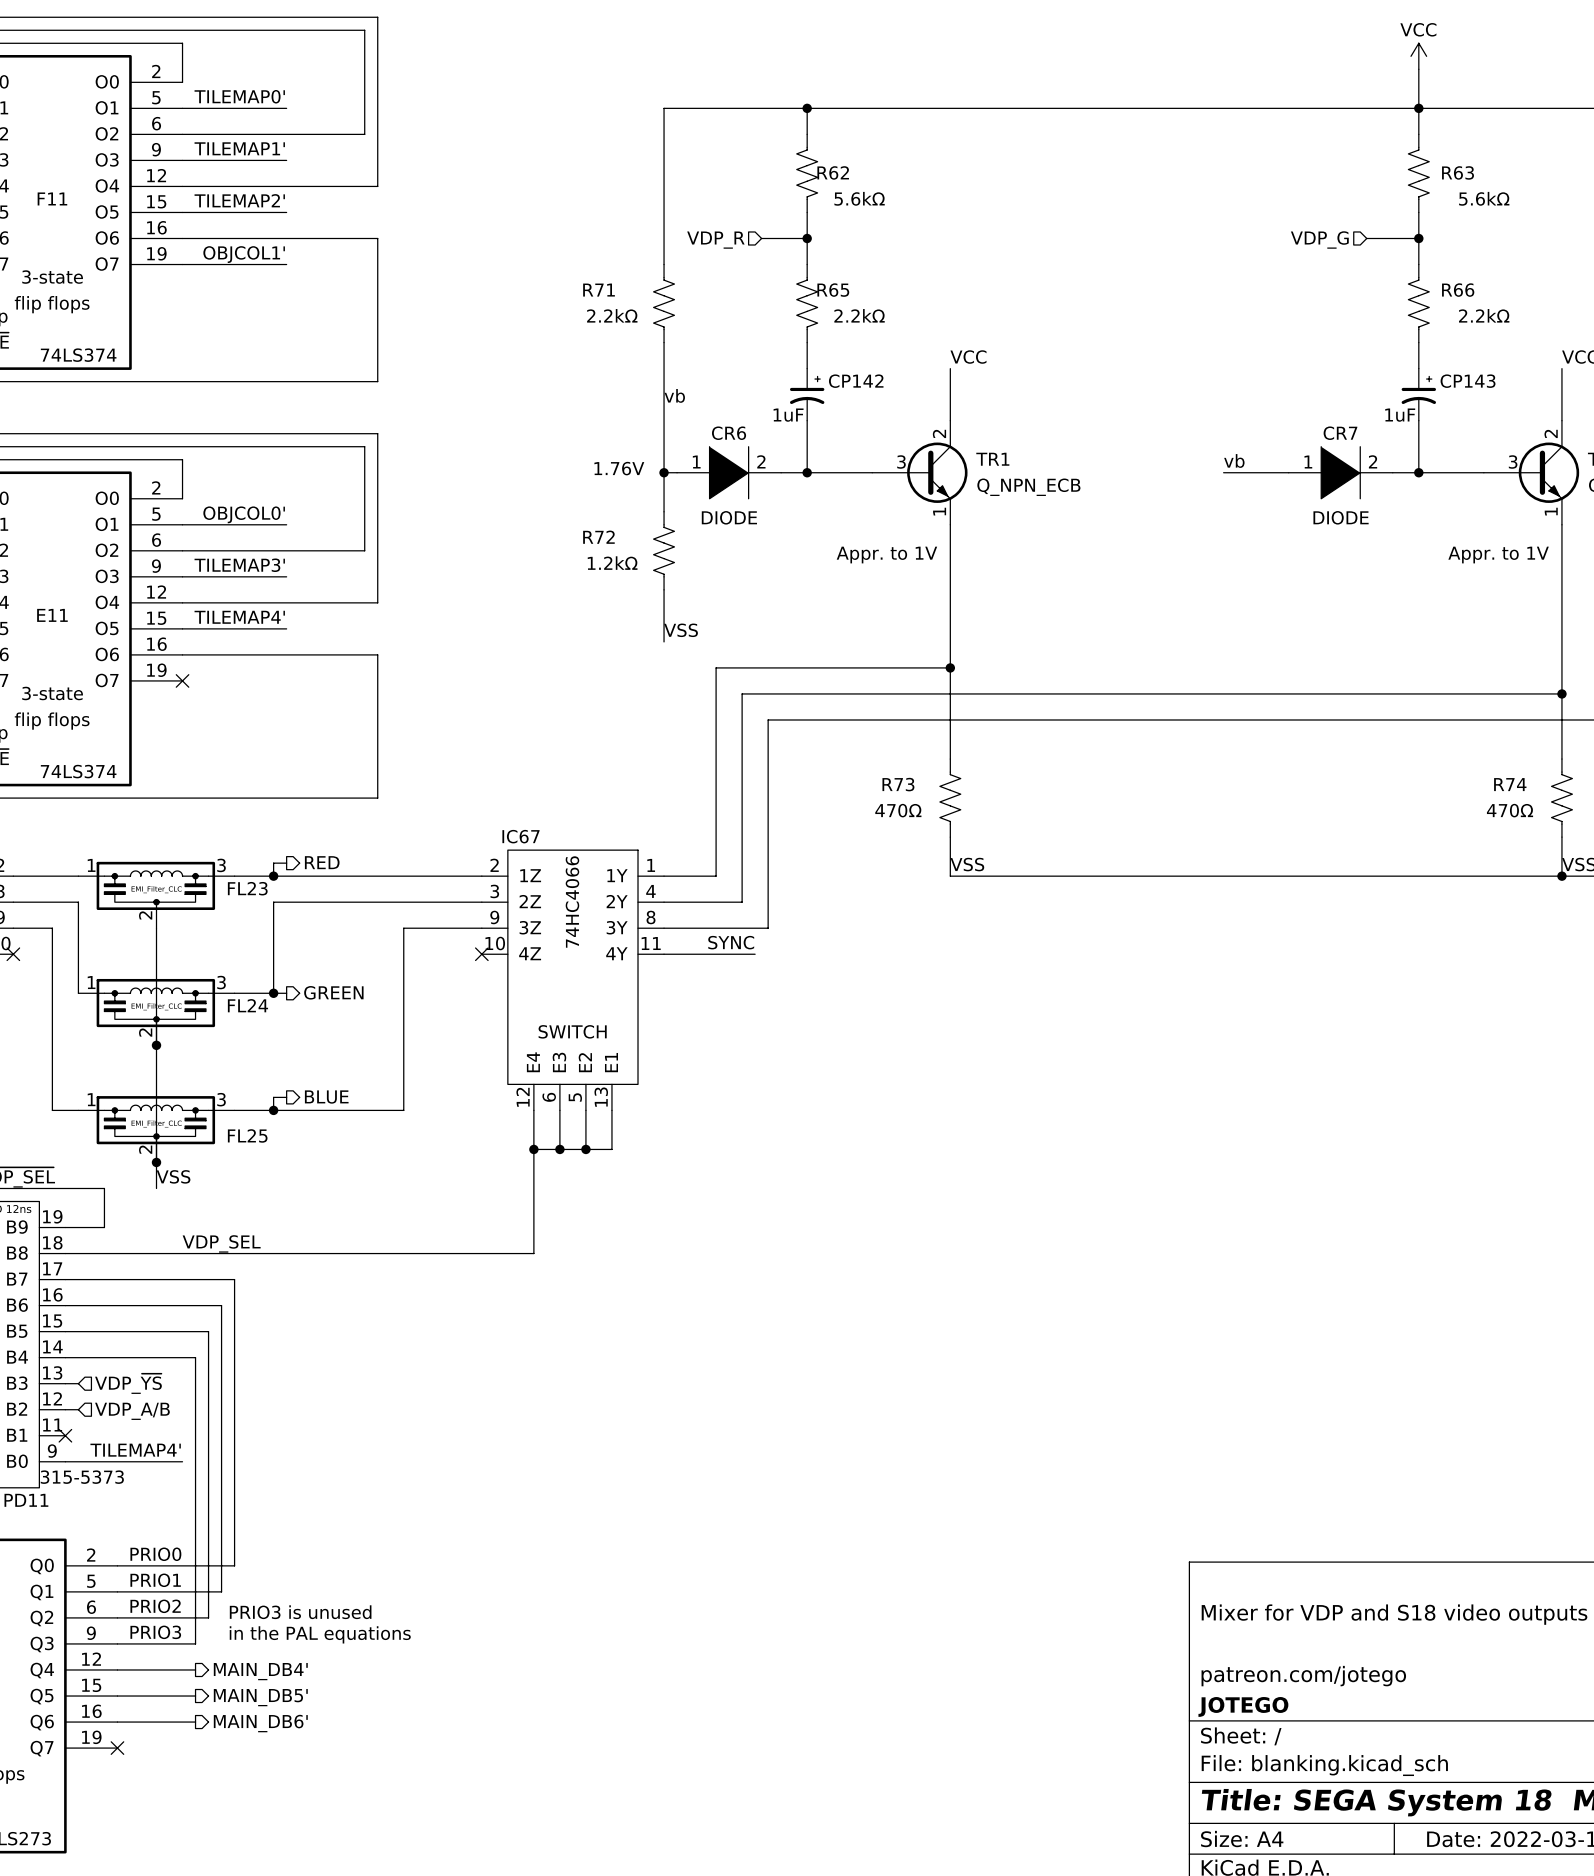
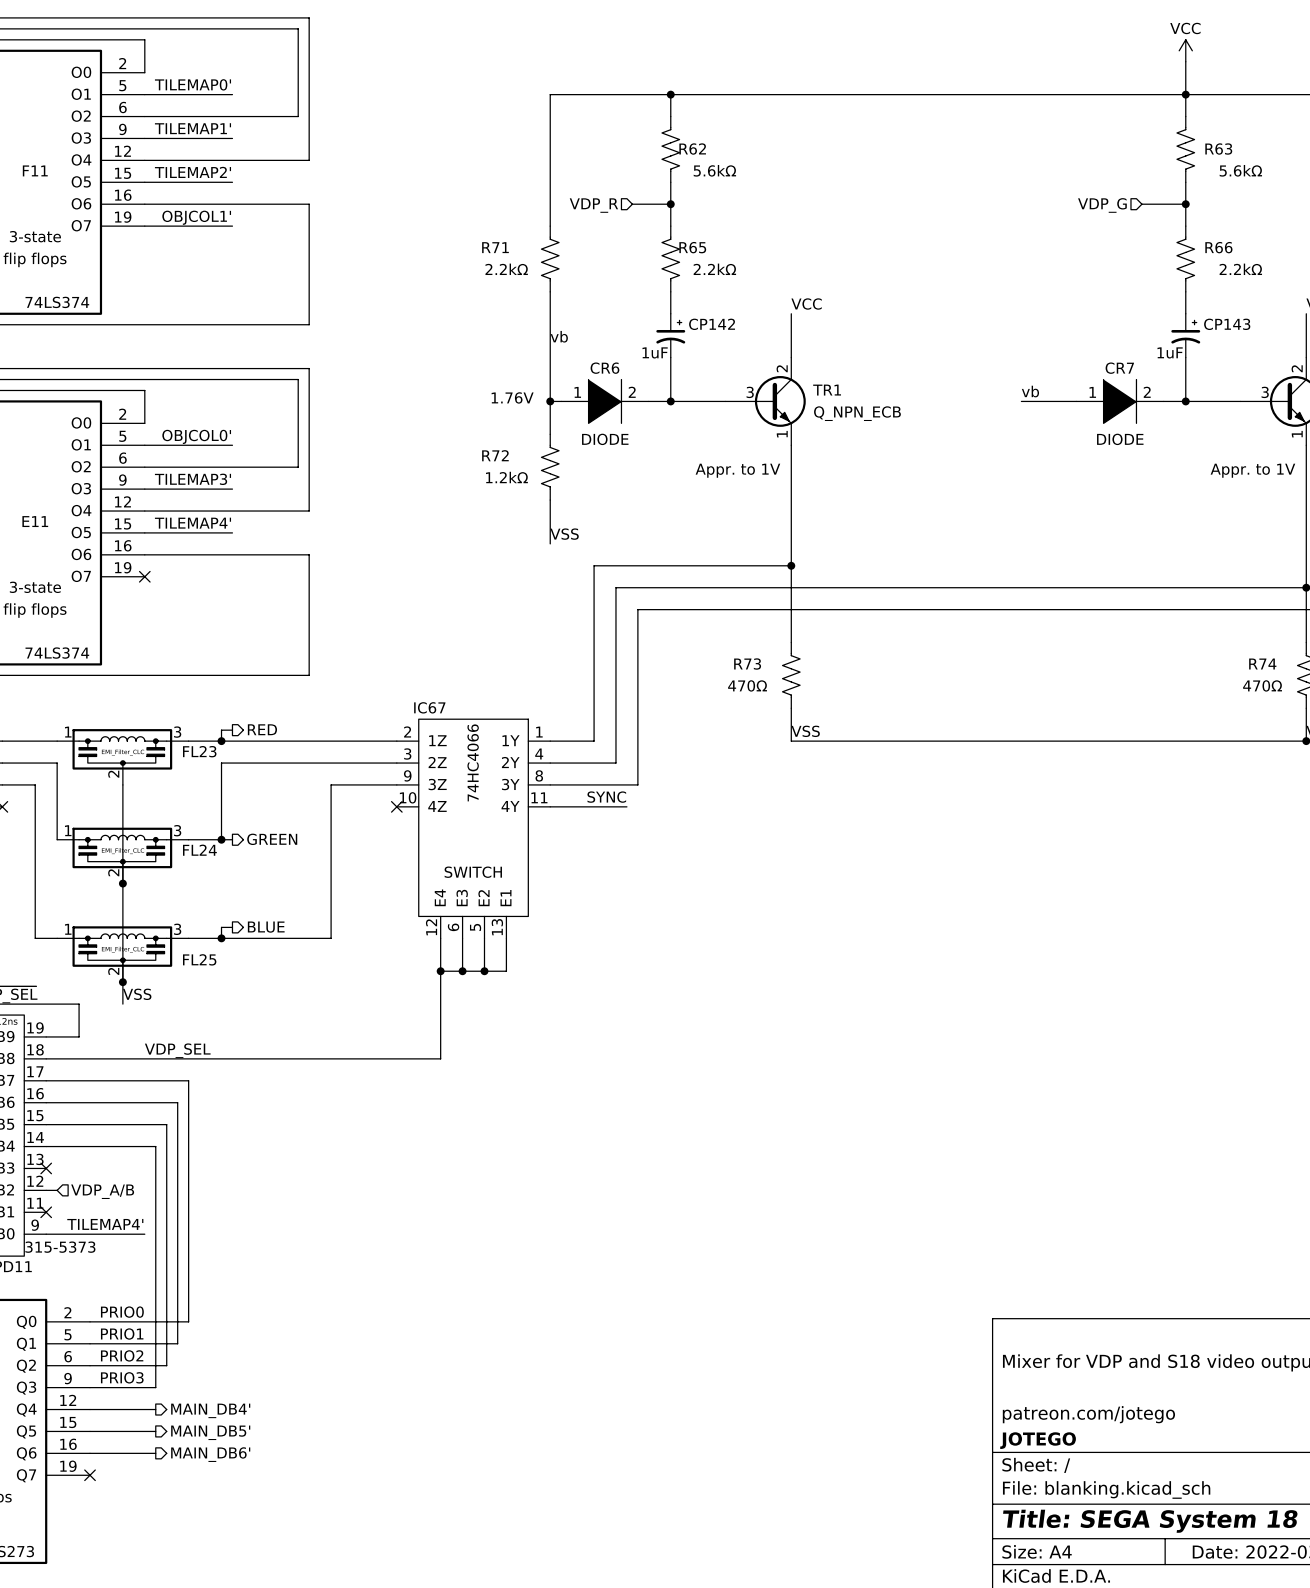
wire: (65, 1383) (78, 1383) -> none
no-connect mark: none -> (46, 1168)
hierarchical label: VDP_~{YS} (128, 1383) -> none
text: PRIO3 is unused (300, 1612) -> none
text: in the PAL equations (320, 1634) -> none

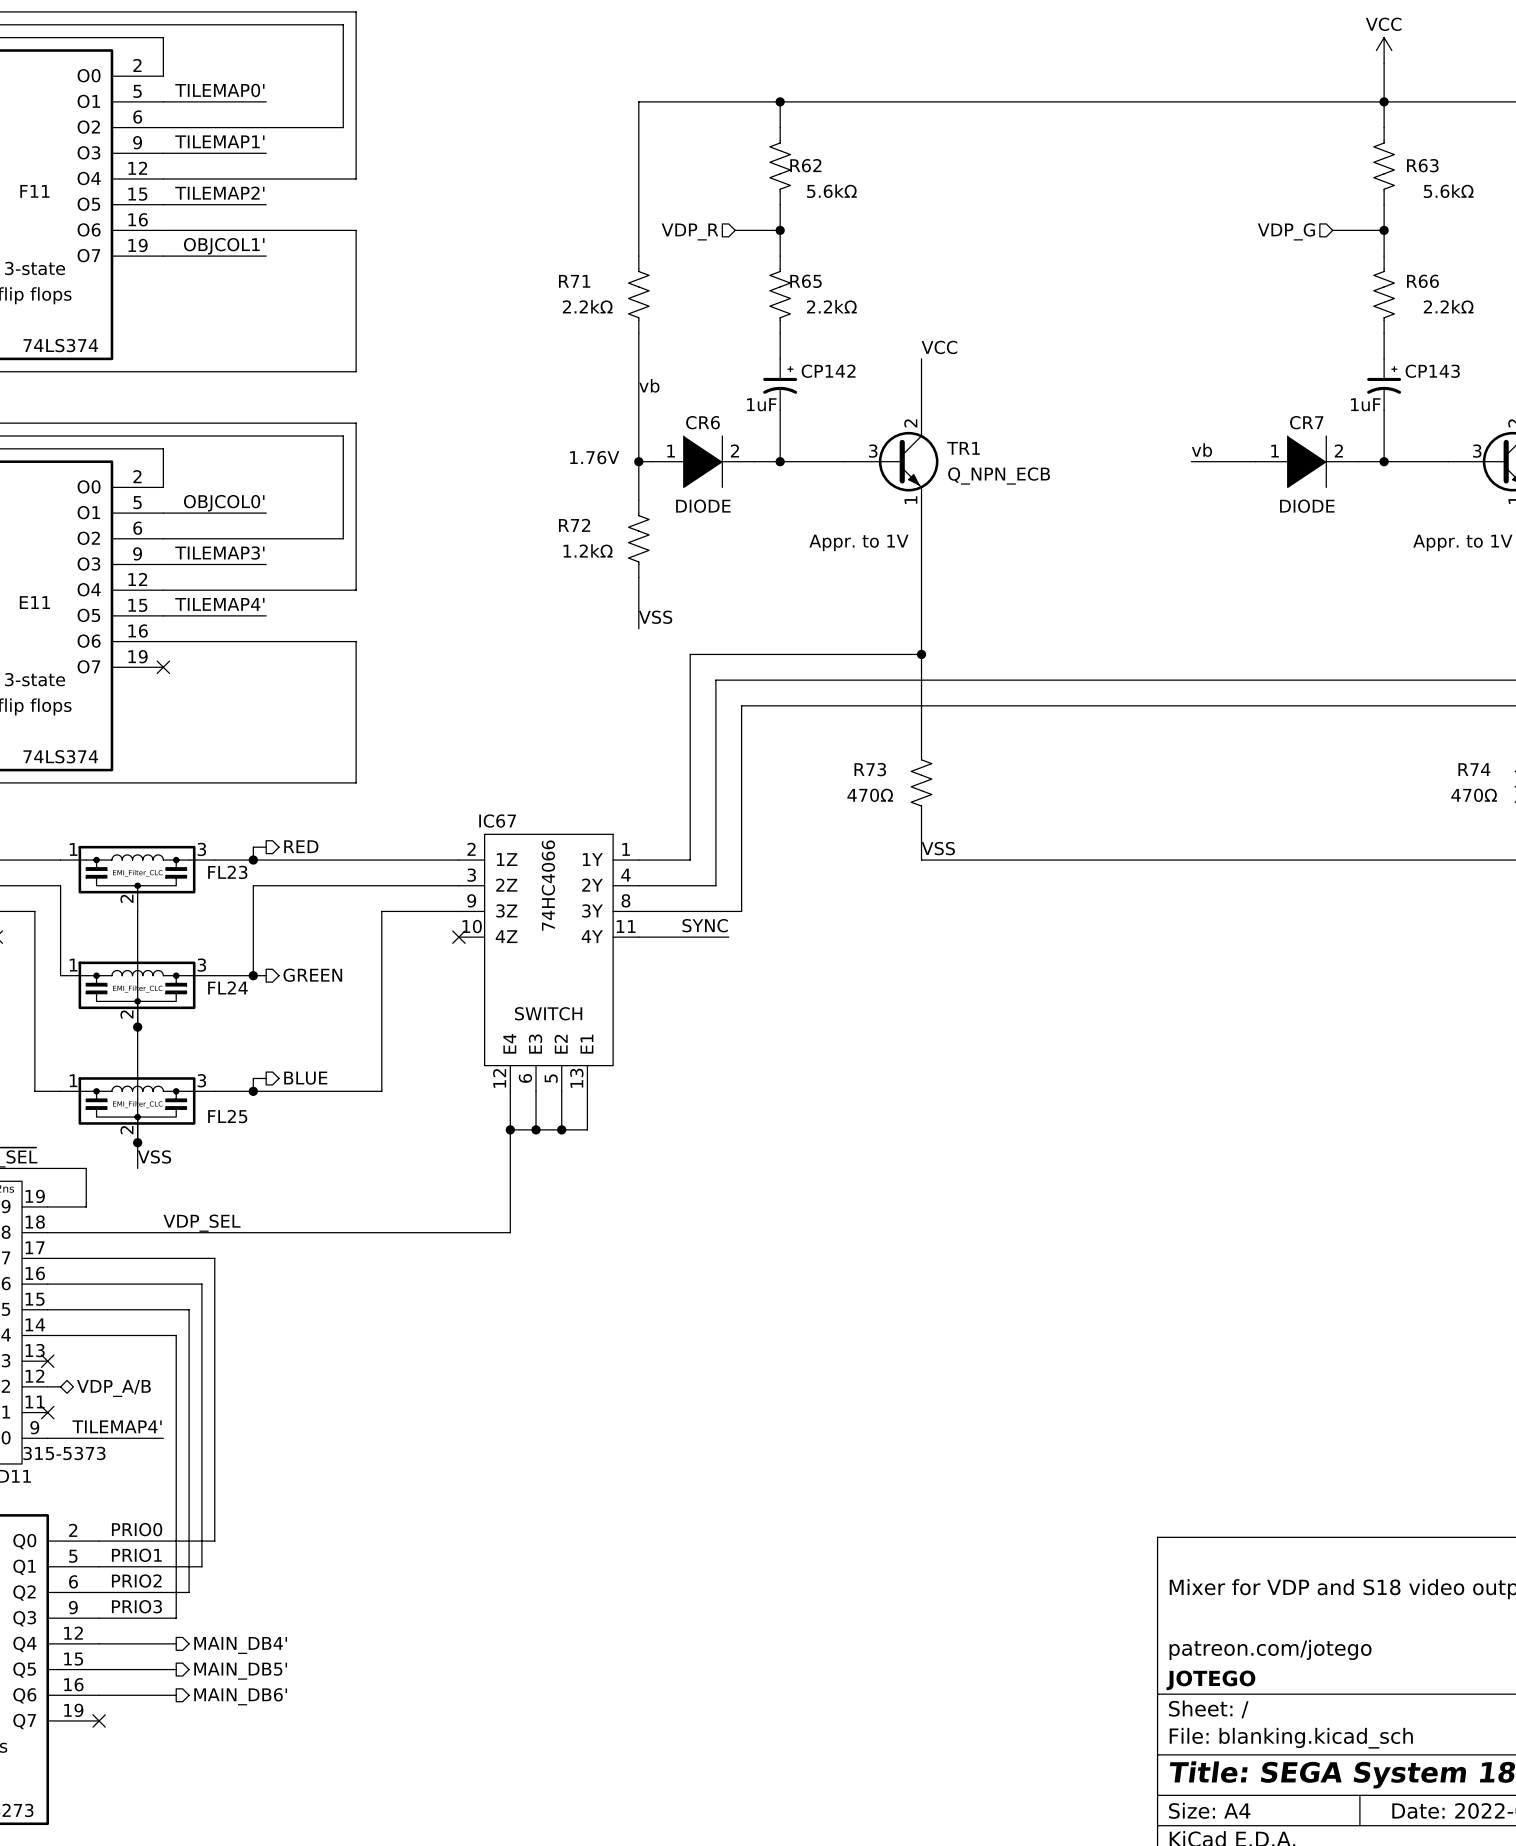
hierarchical label shape: input (102, 1191) -> bidirectional (113, 1388)

